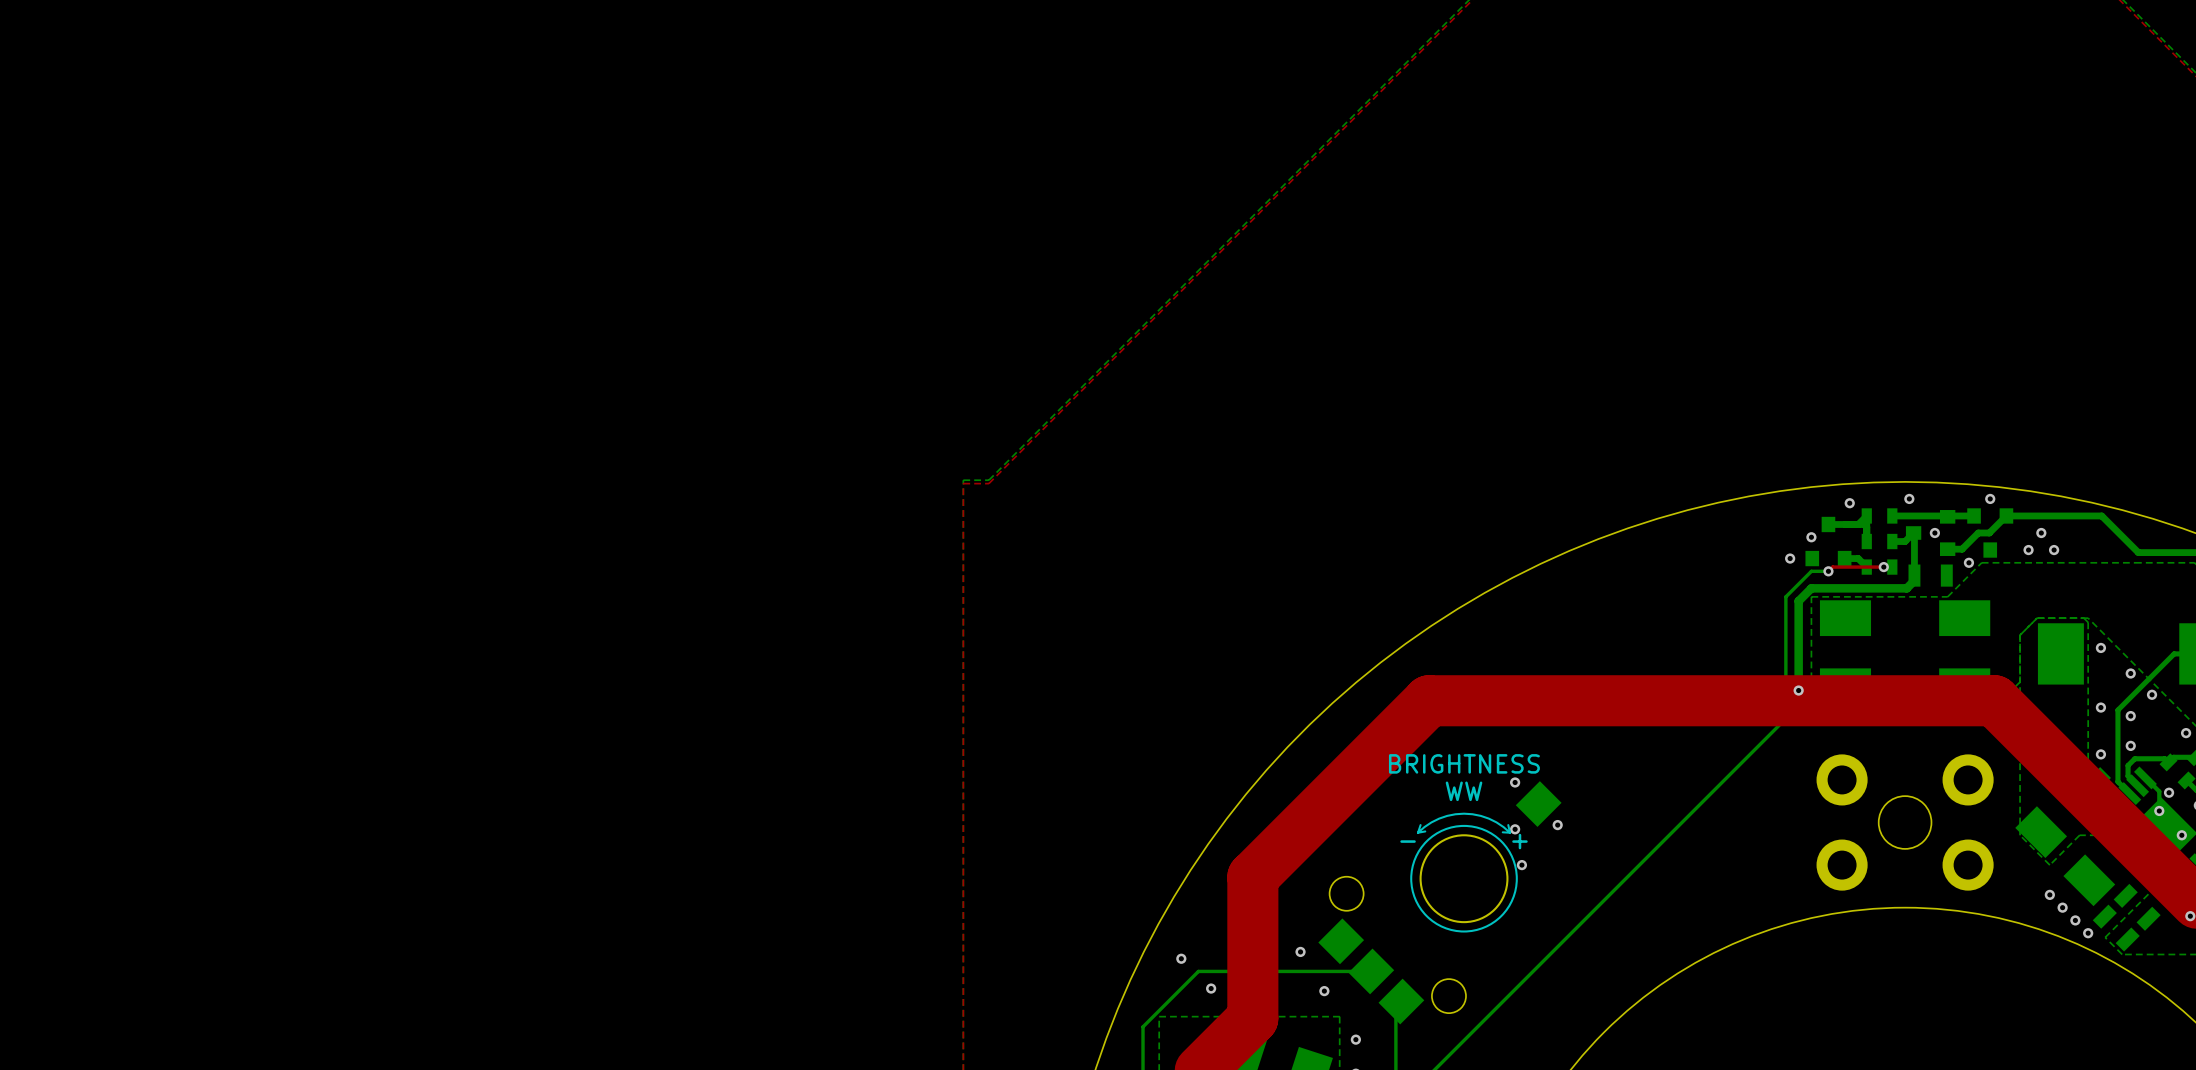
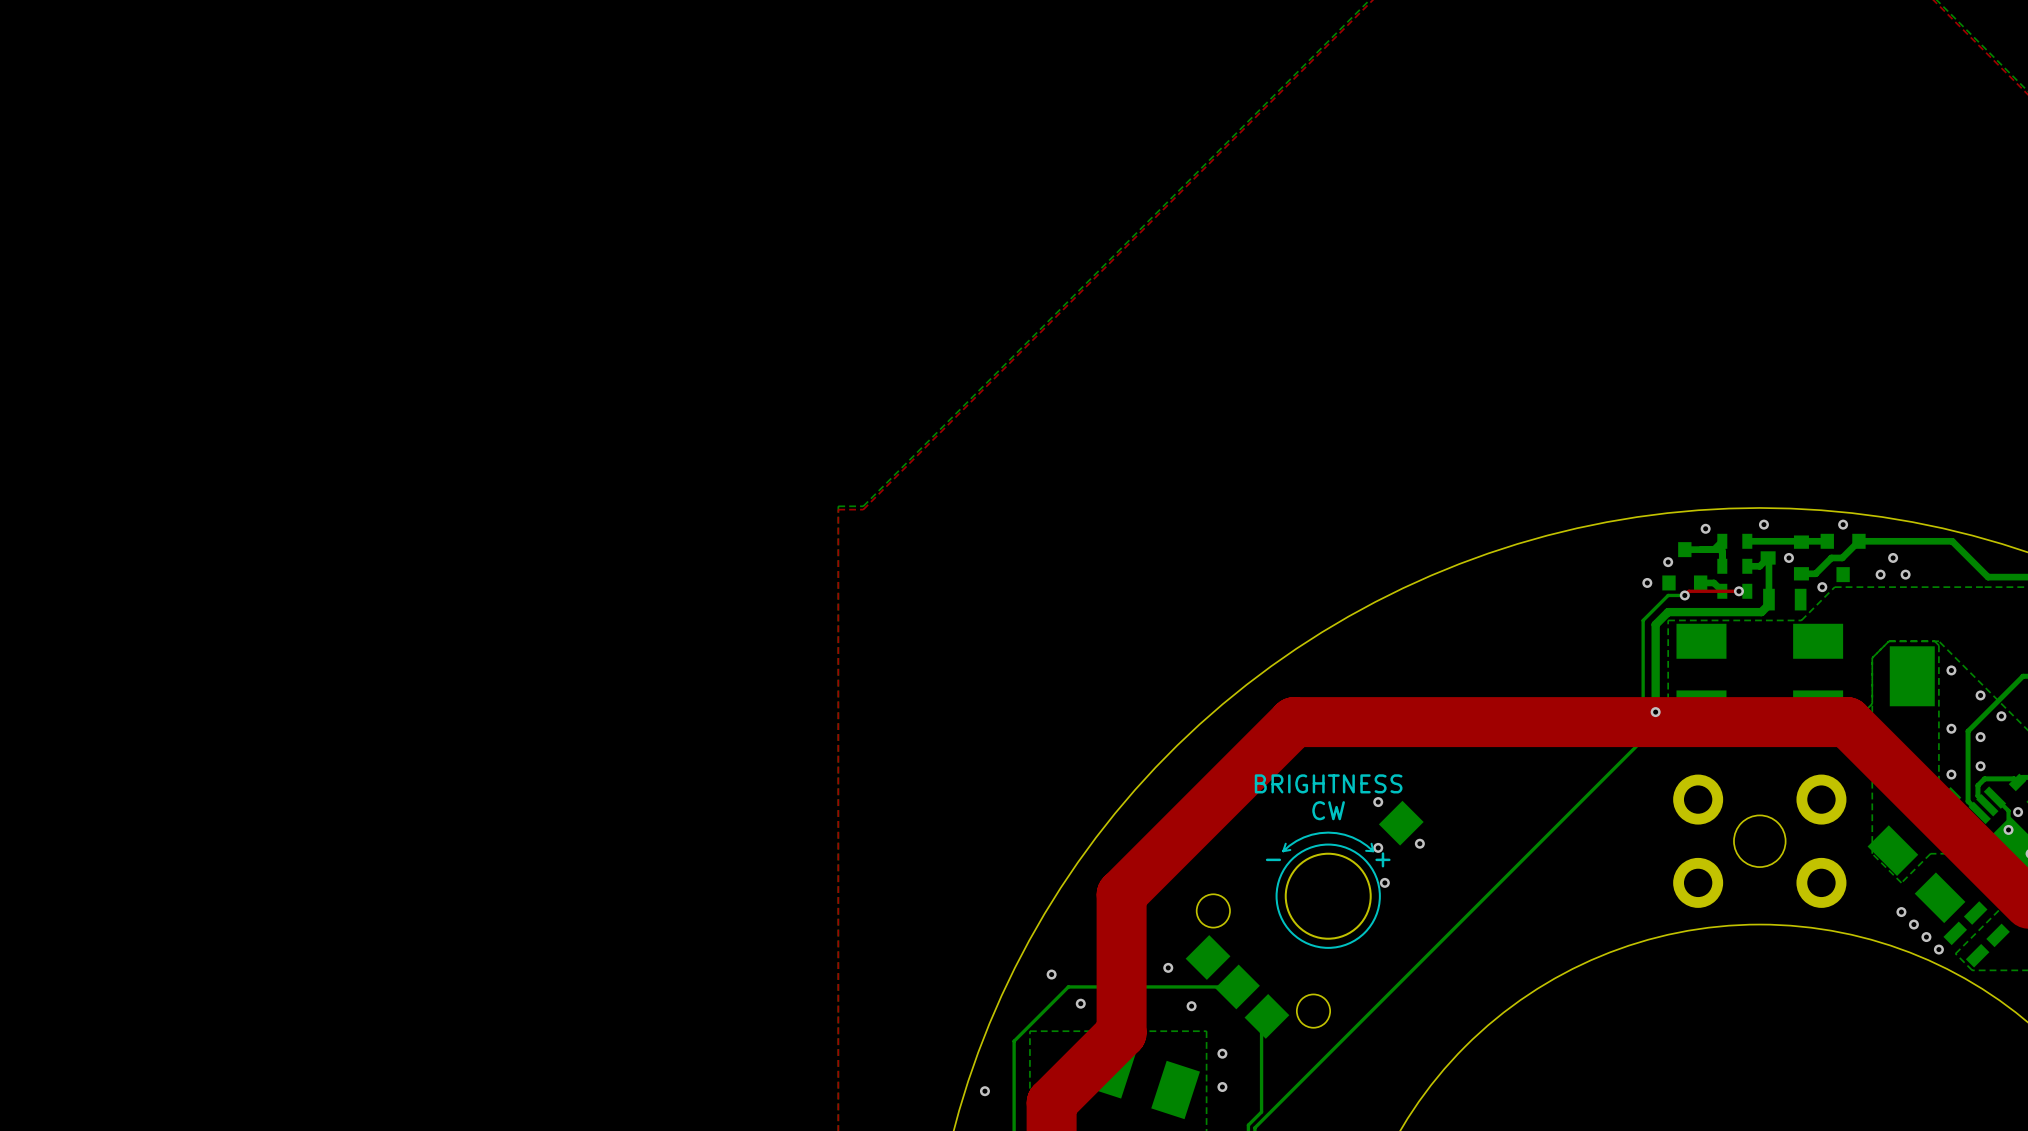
text: WW (1464, 791) -> CW (1328, 810)

